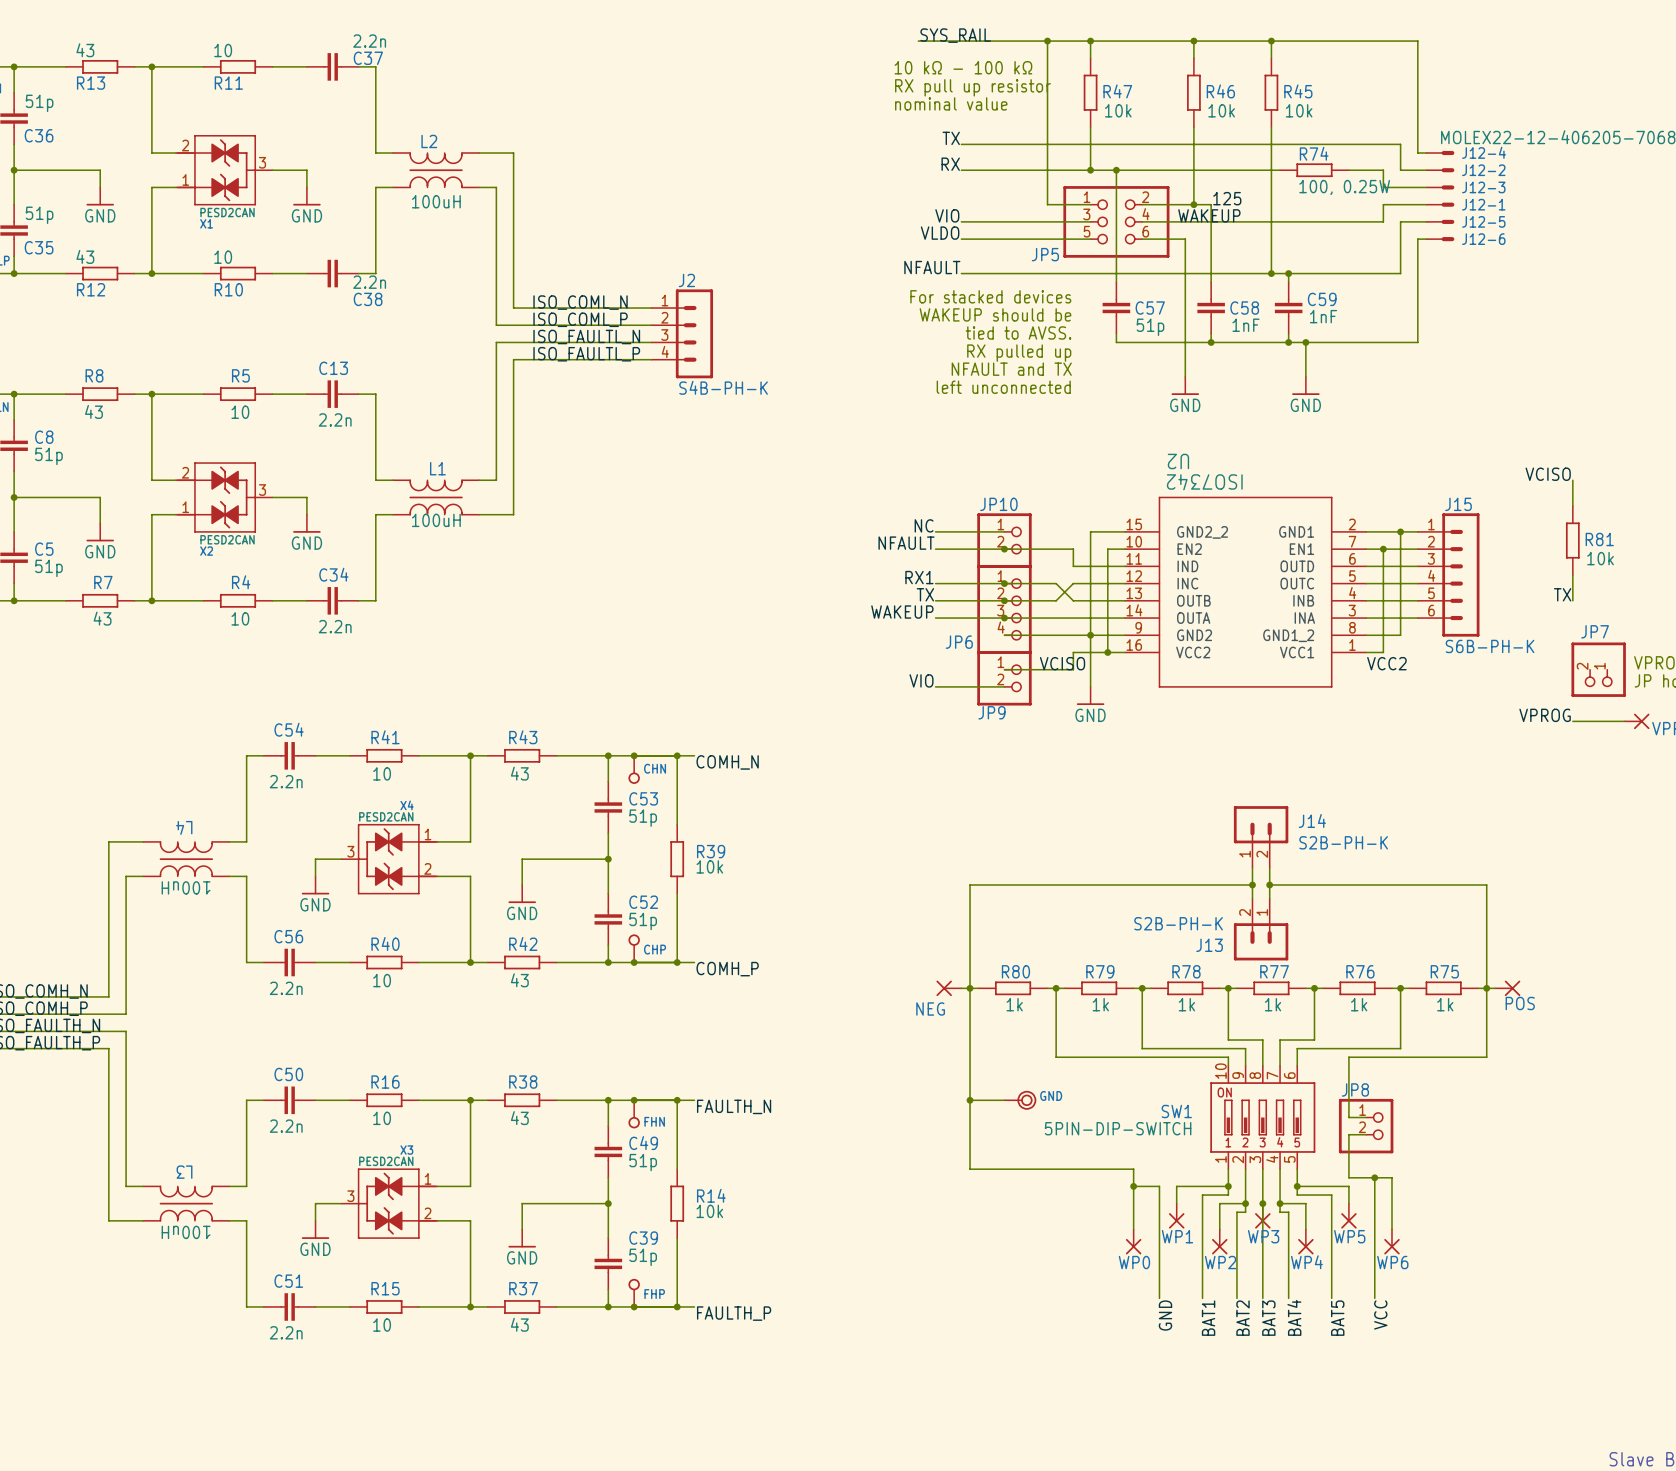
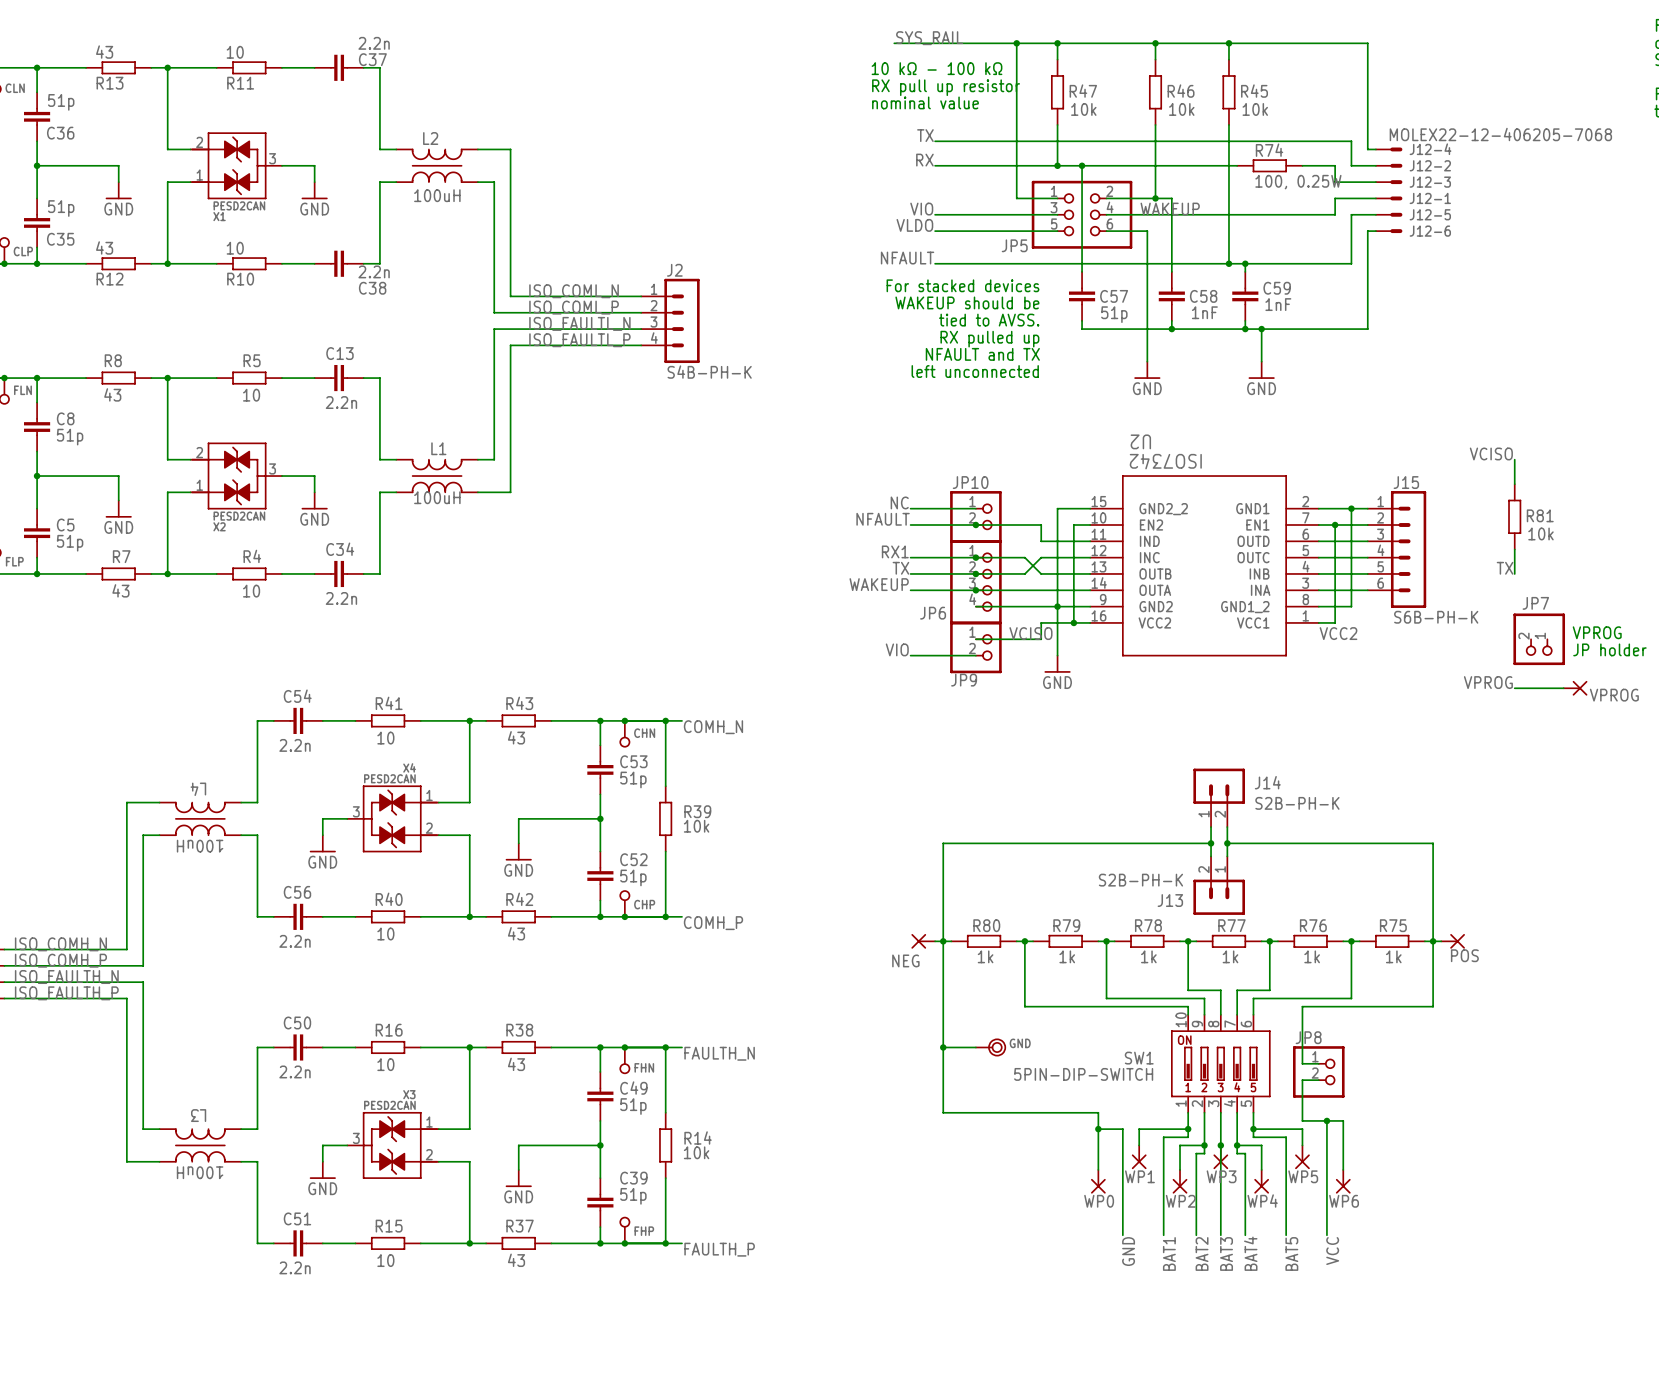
label: 125 (1227, 198) -> none

